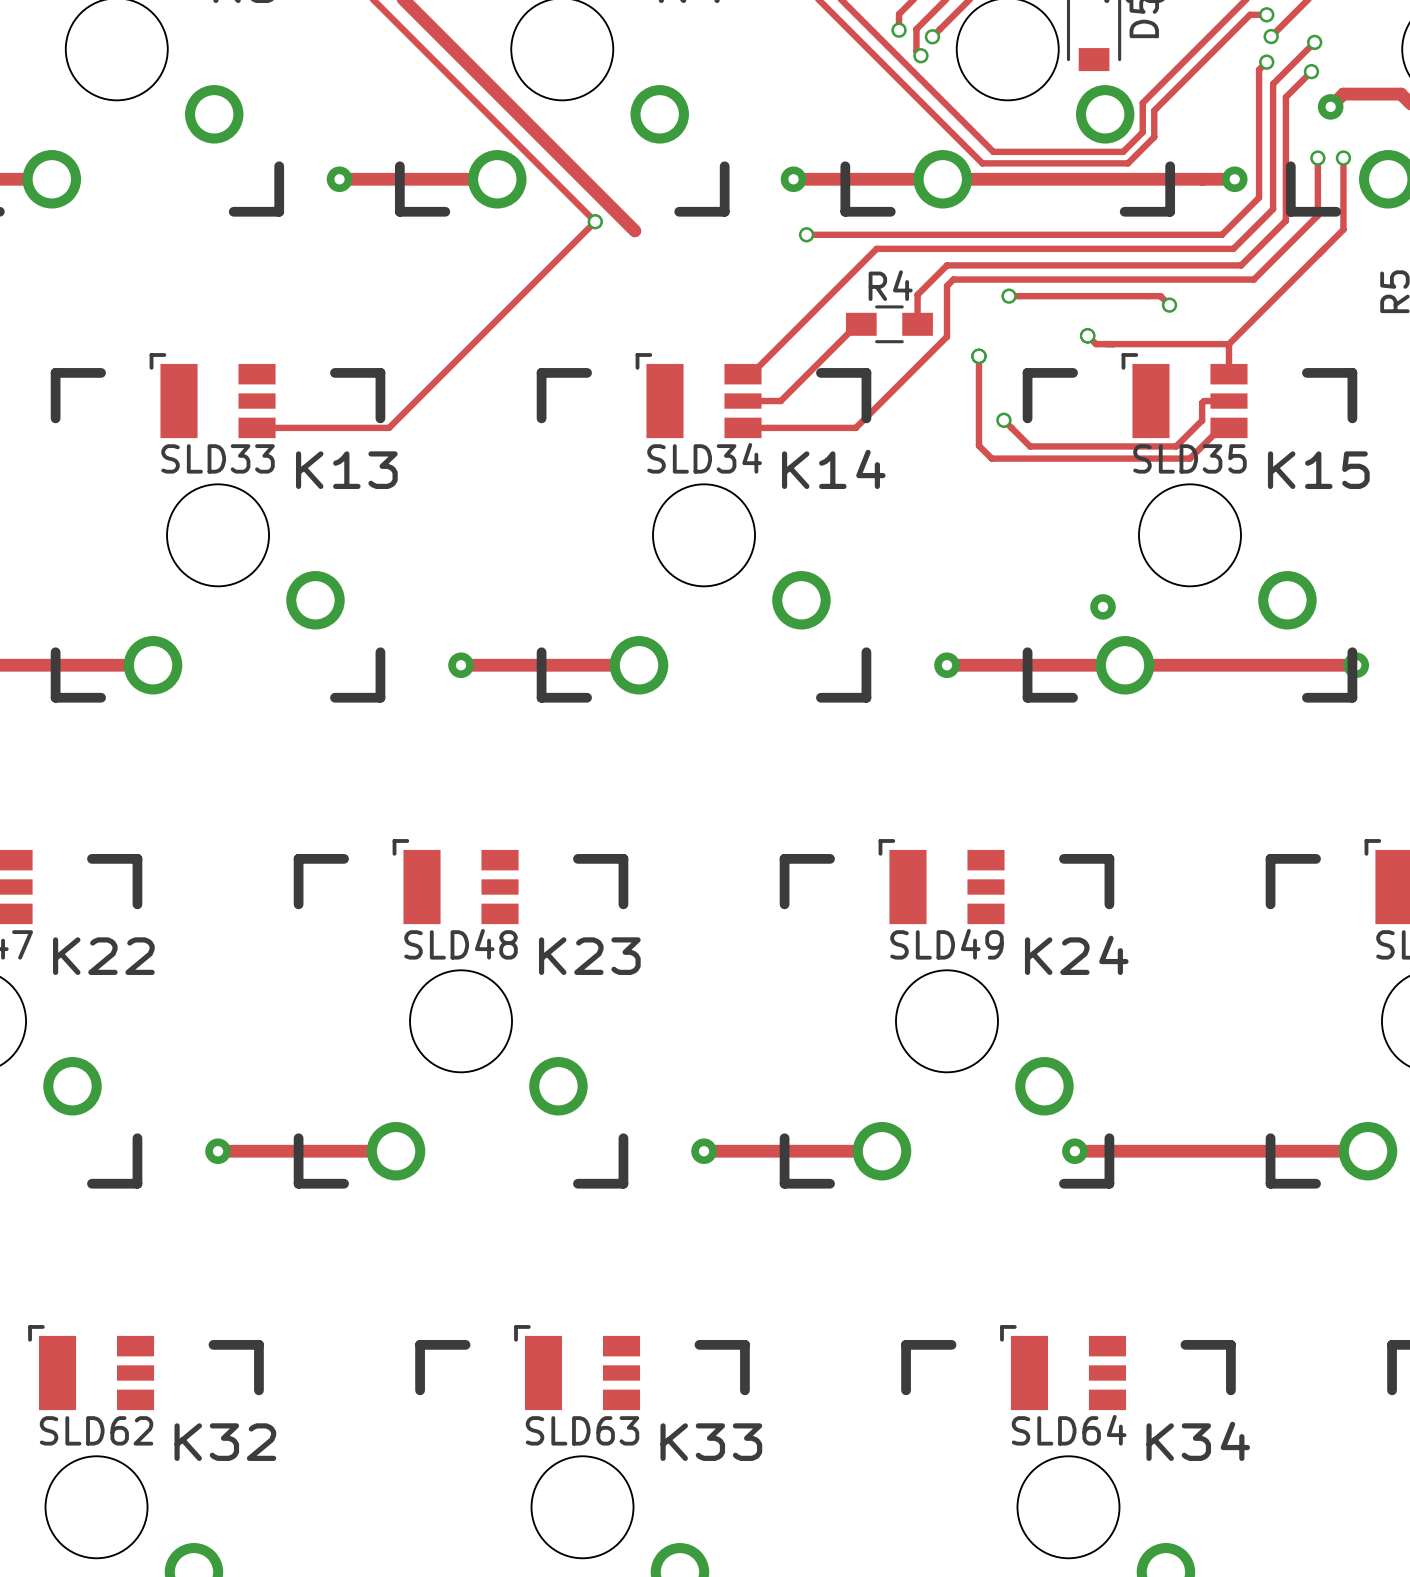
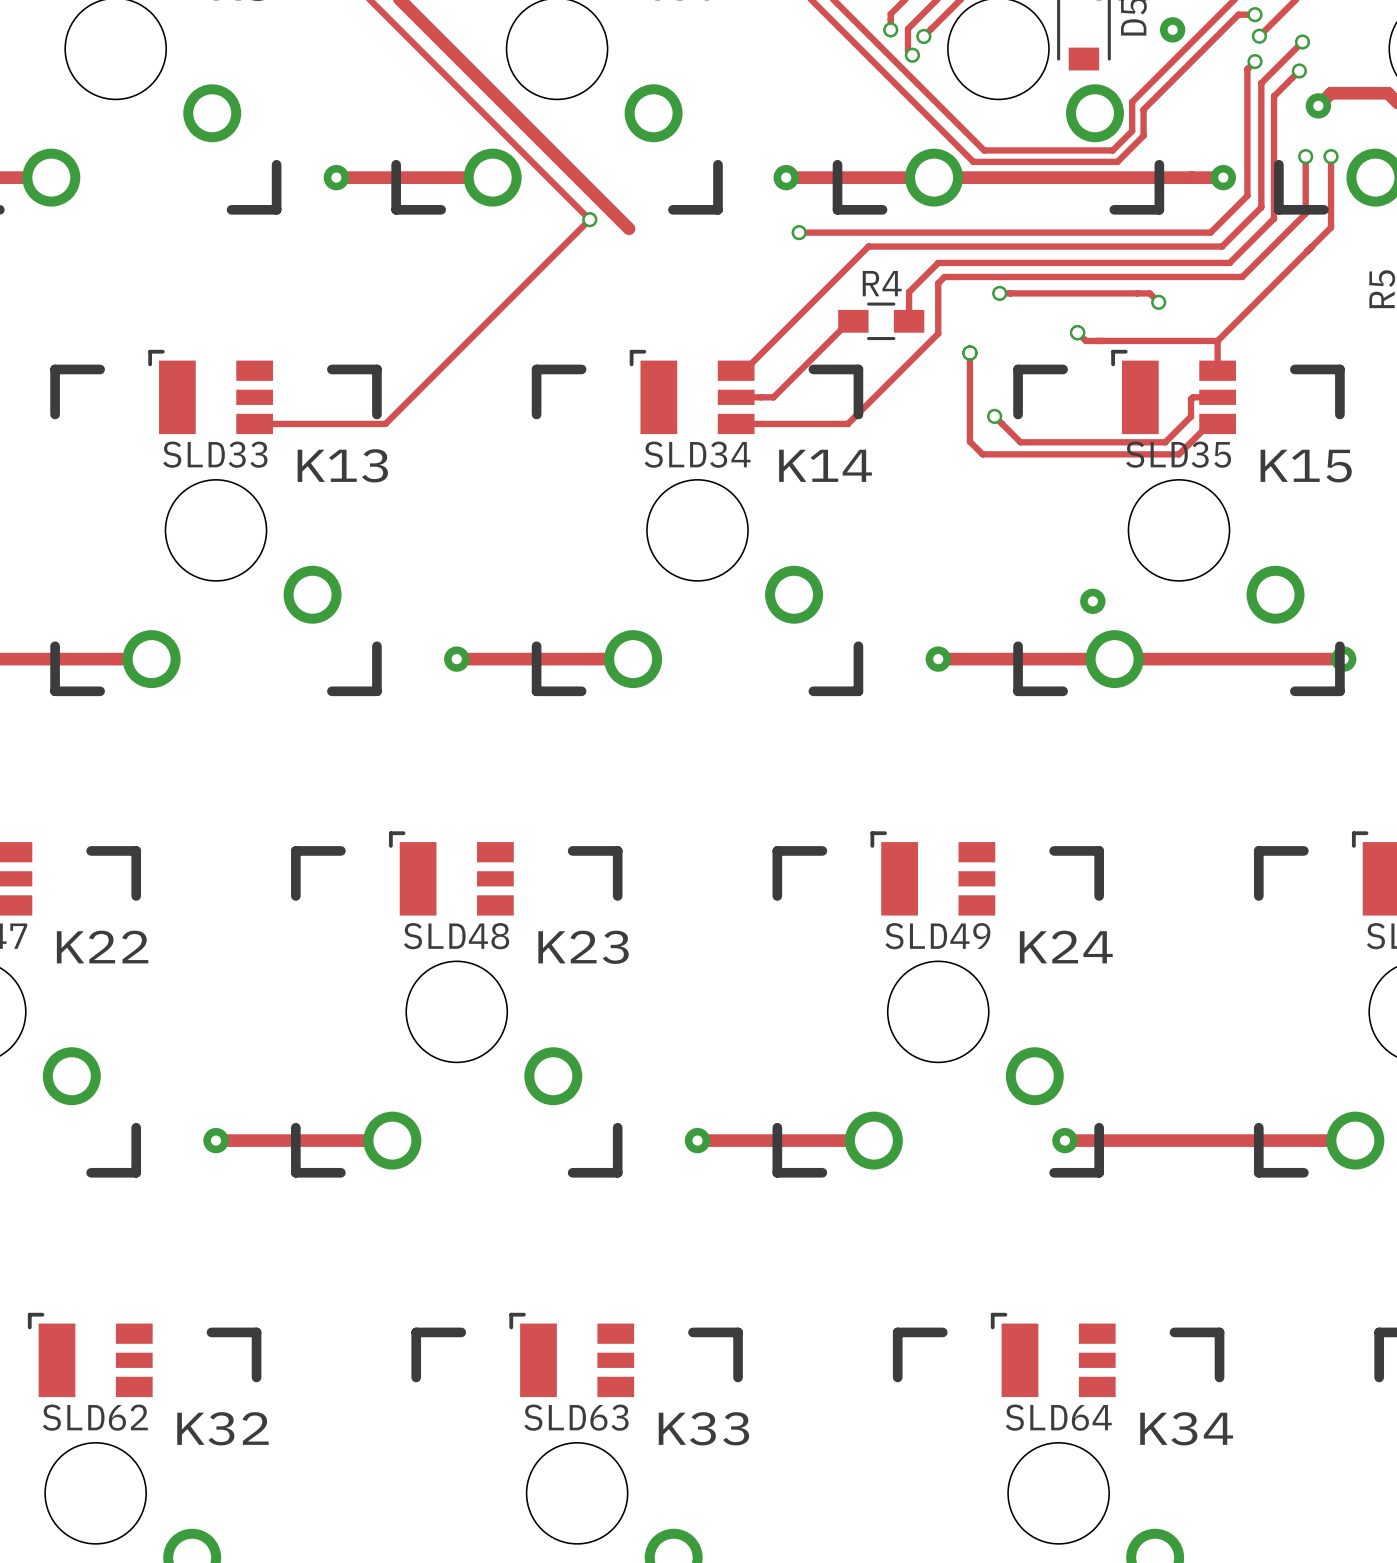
via: none -> (1172, 29)

